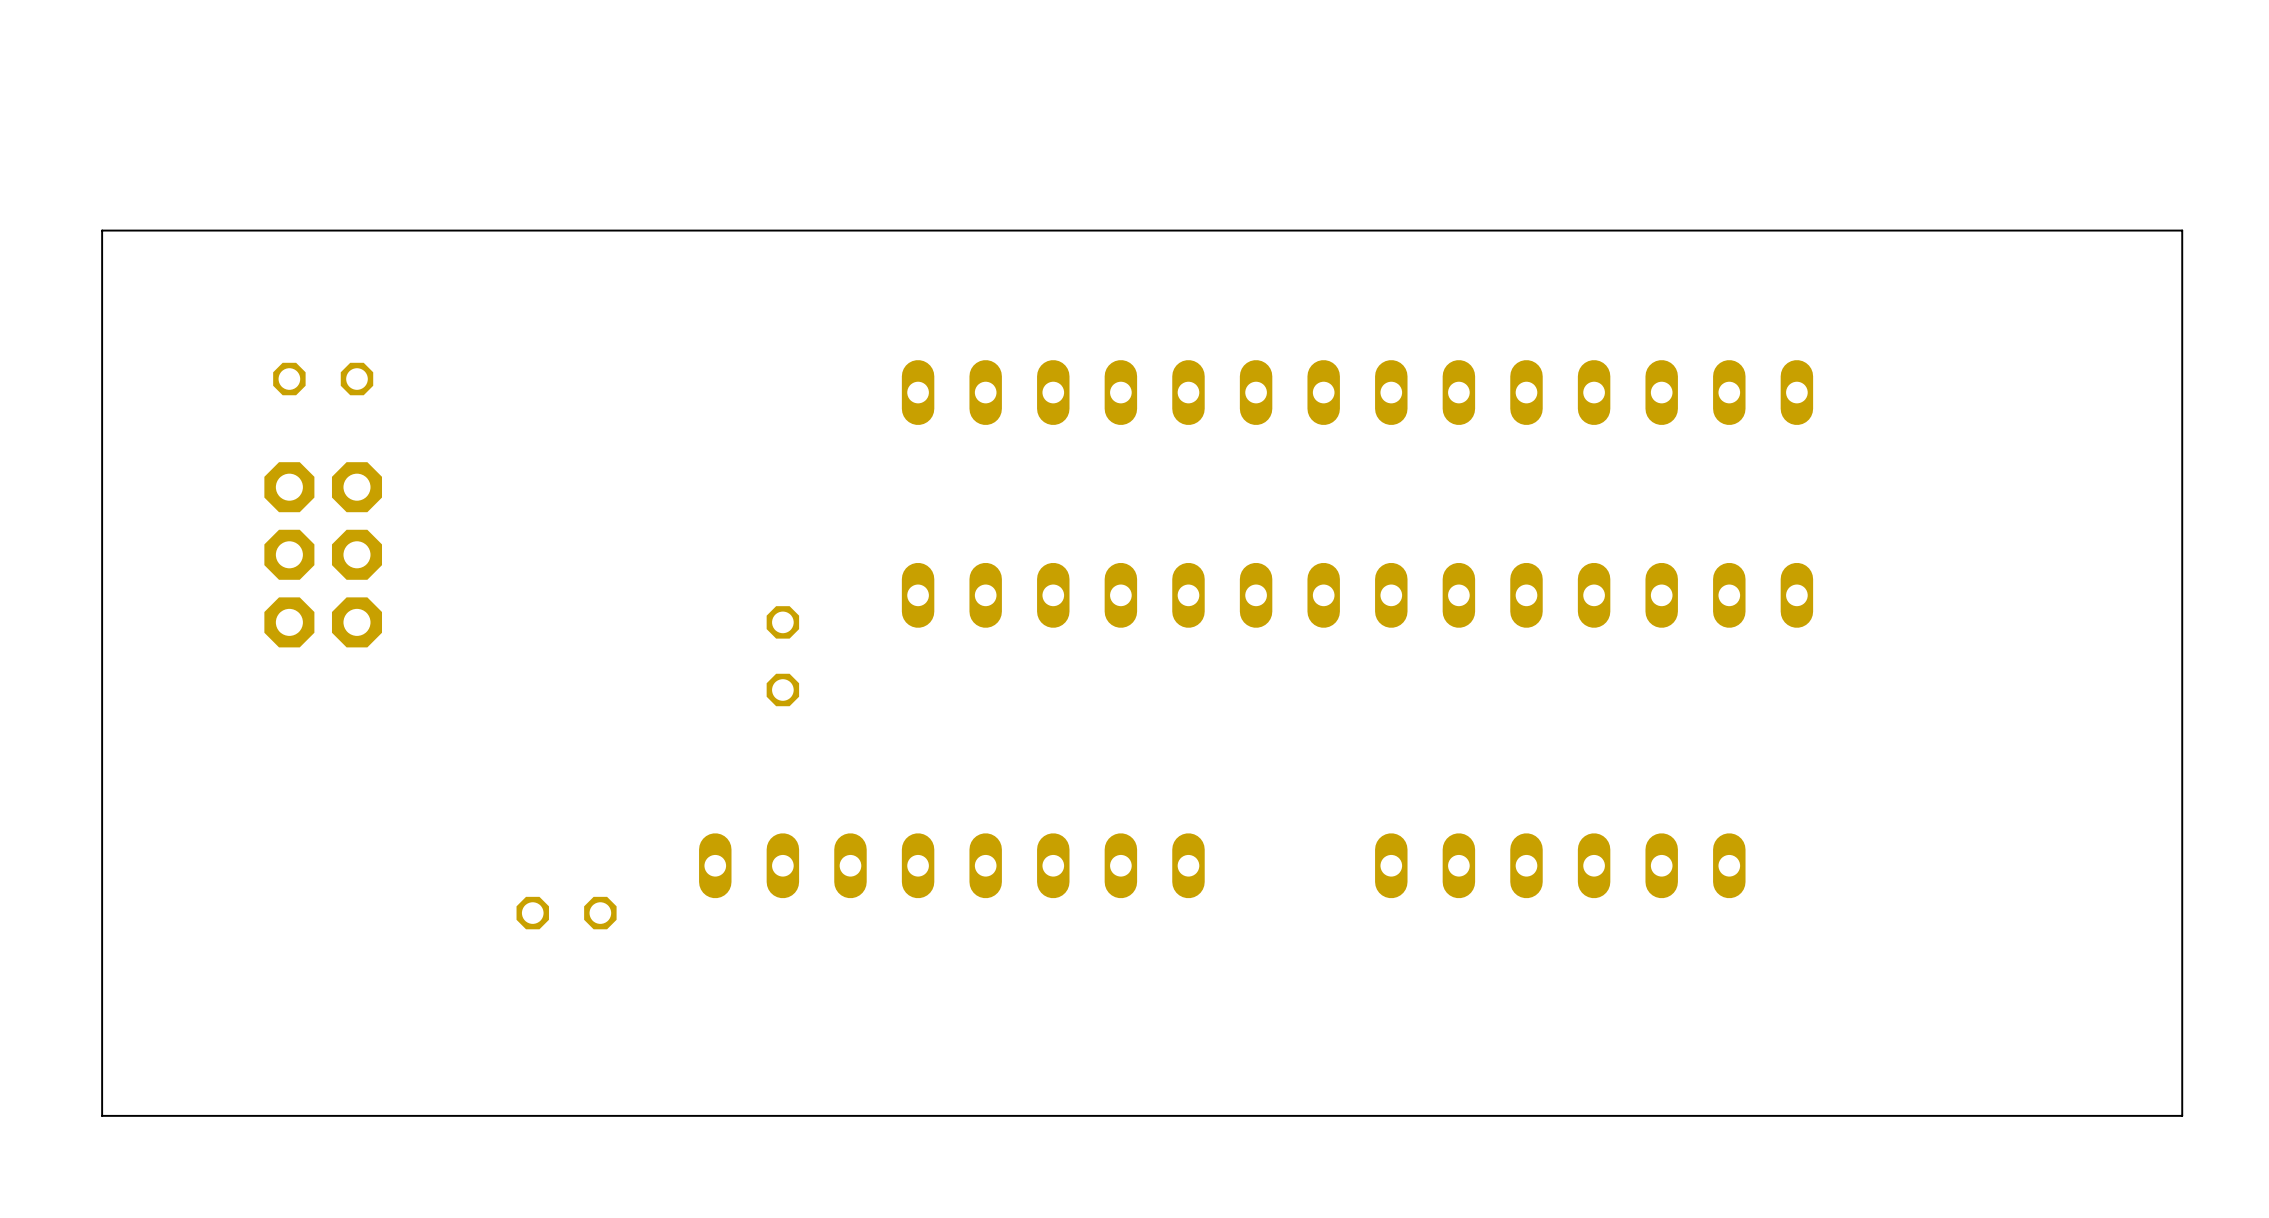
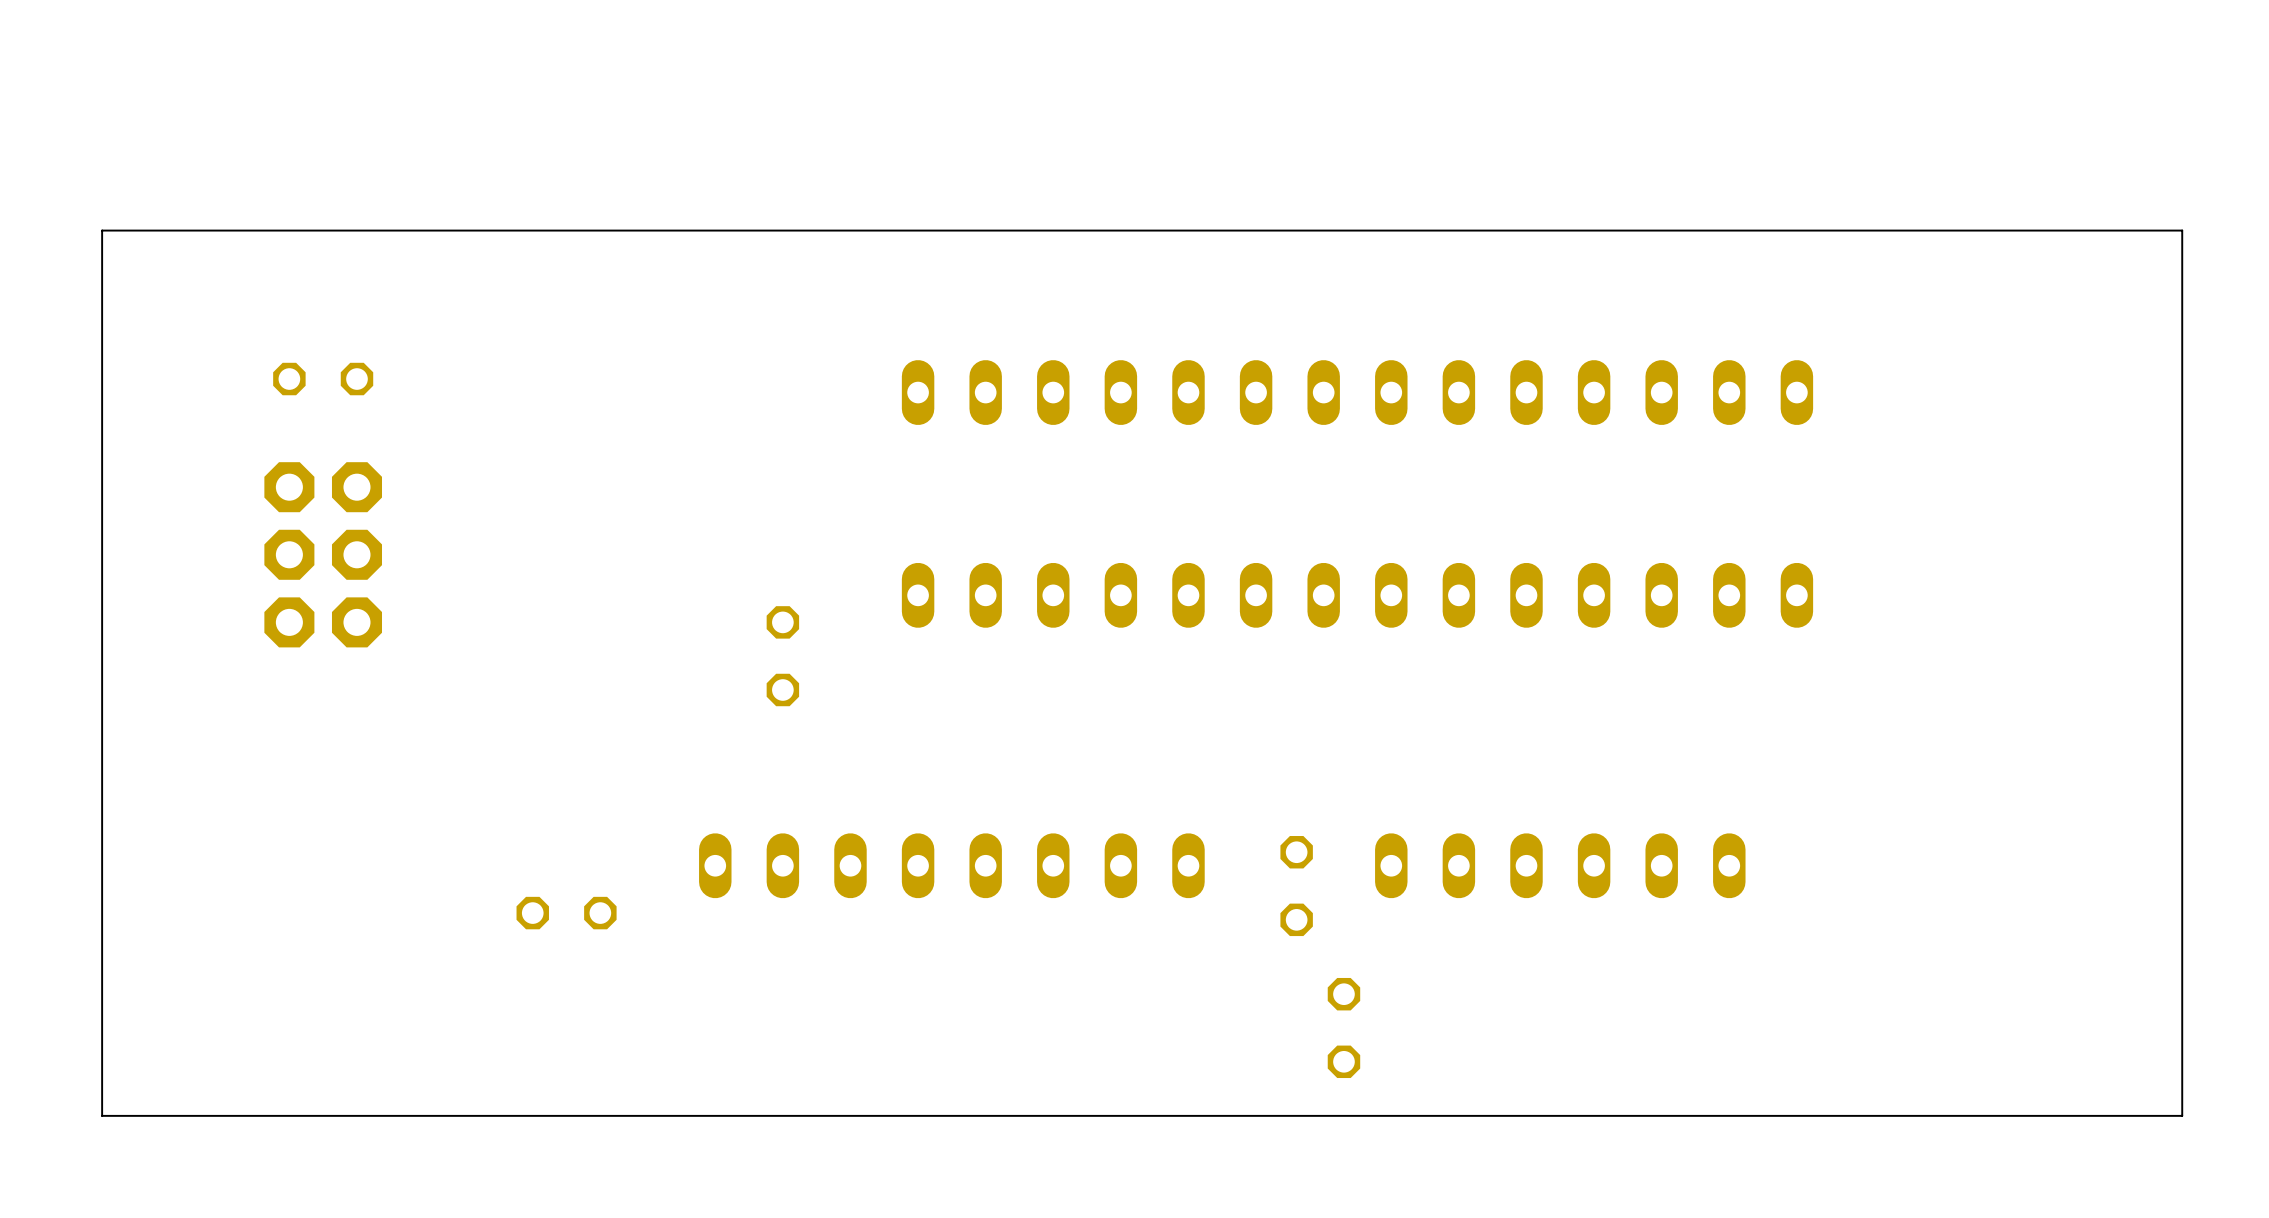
part: none -> (1296, 886)
part: none -> (1343, 1028)

